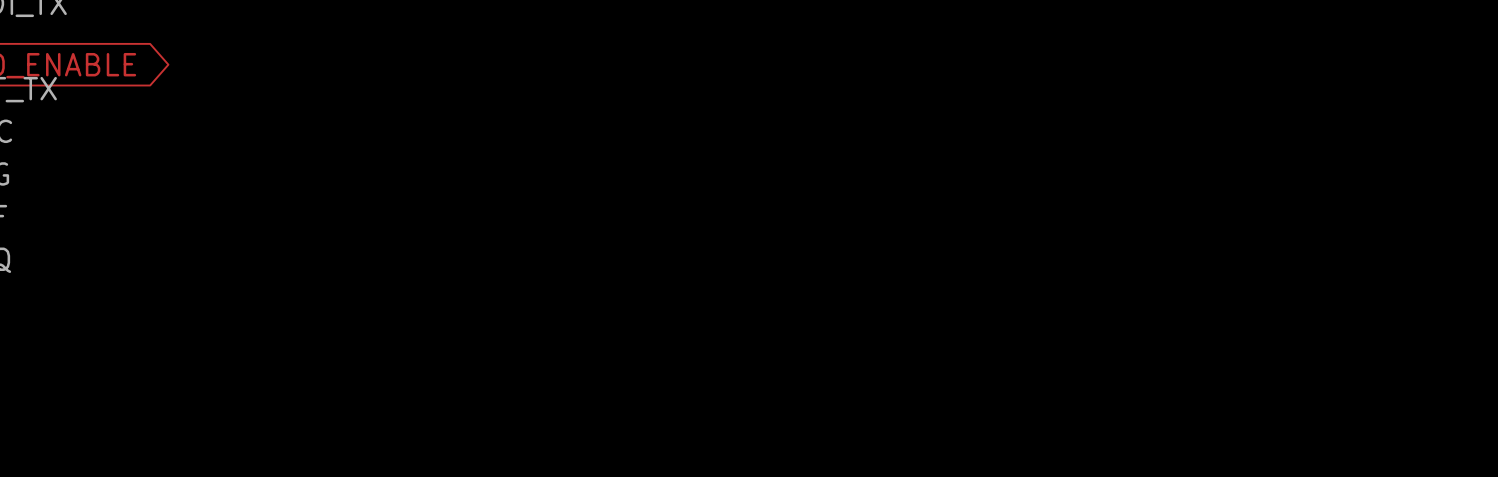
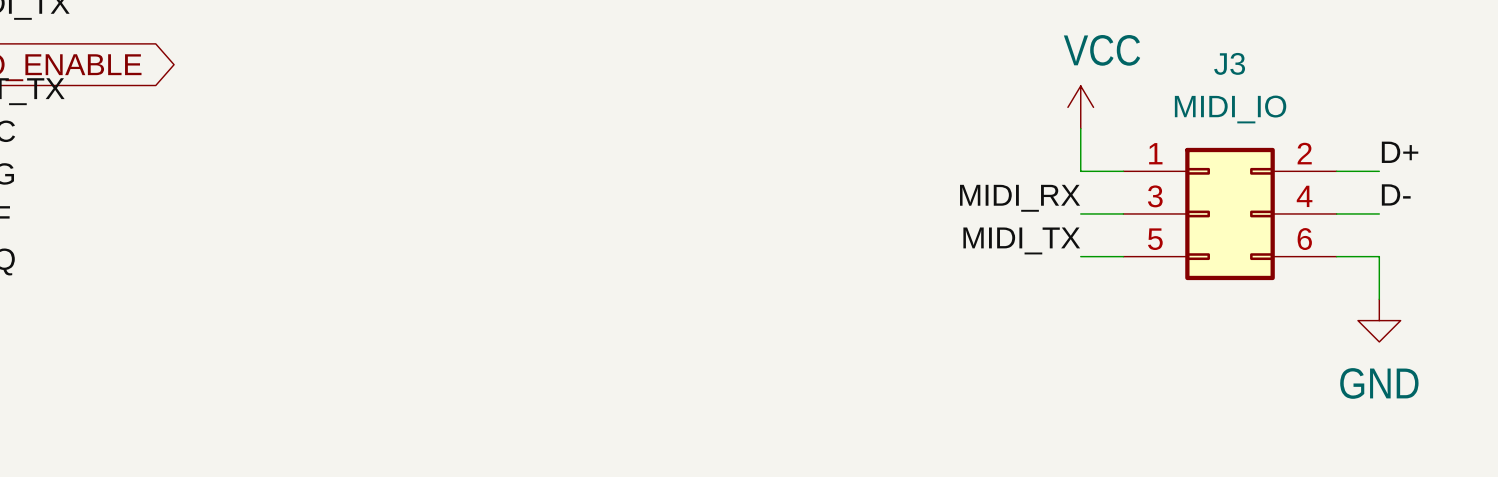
power symbol: none -> VCC (1080, 107)
wire: none -> (1080, 128) (1080, 171) (1123, 171)
label: none -> D+ (1400, 152)
wire: none -> (1336, 171) (1379, 171)
label: none -> D- (1396, 194)
label: none -> MIDI_RX (1020, 198)
wire: none -> (1080, 213) (1123, 213)
J3: none -> MIDI_IO (1230, 213)
wire: none -> (1336, 213) (1379, 213)
label: none -> MIDI_TX (1021, 240)
wire: none -> (1080, 256) (1123, 256)
wire: none -> (1336, 256) (1379, 256) (1379, 299)
power symbol: none -> GND (1379, 320)

